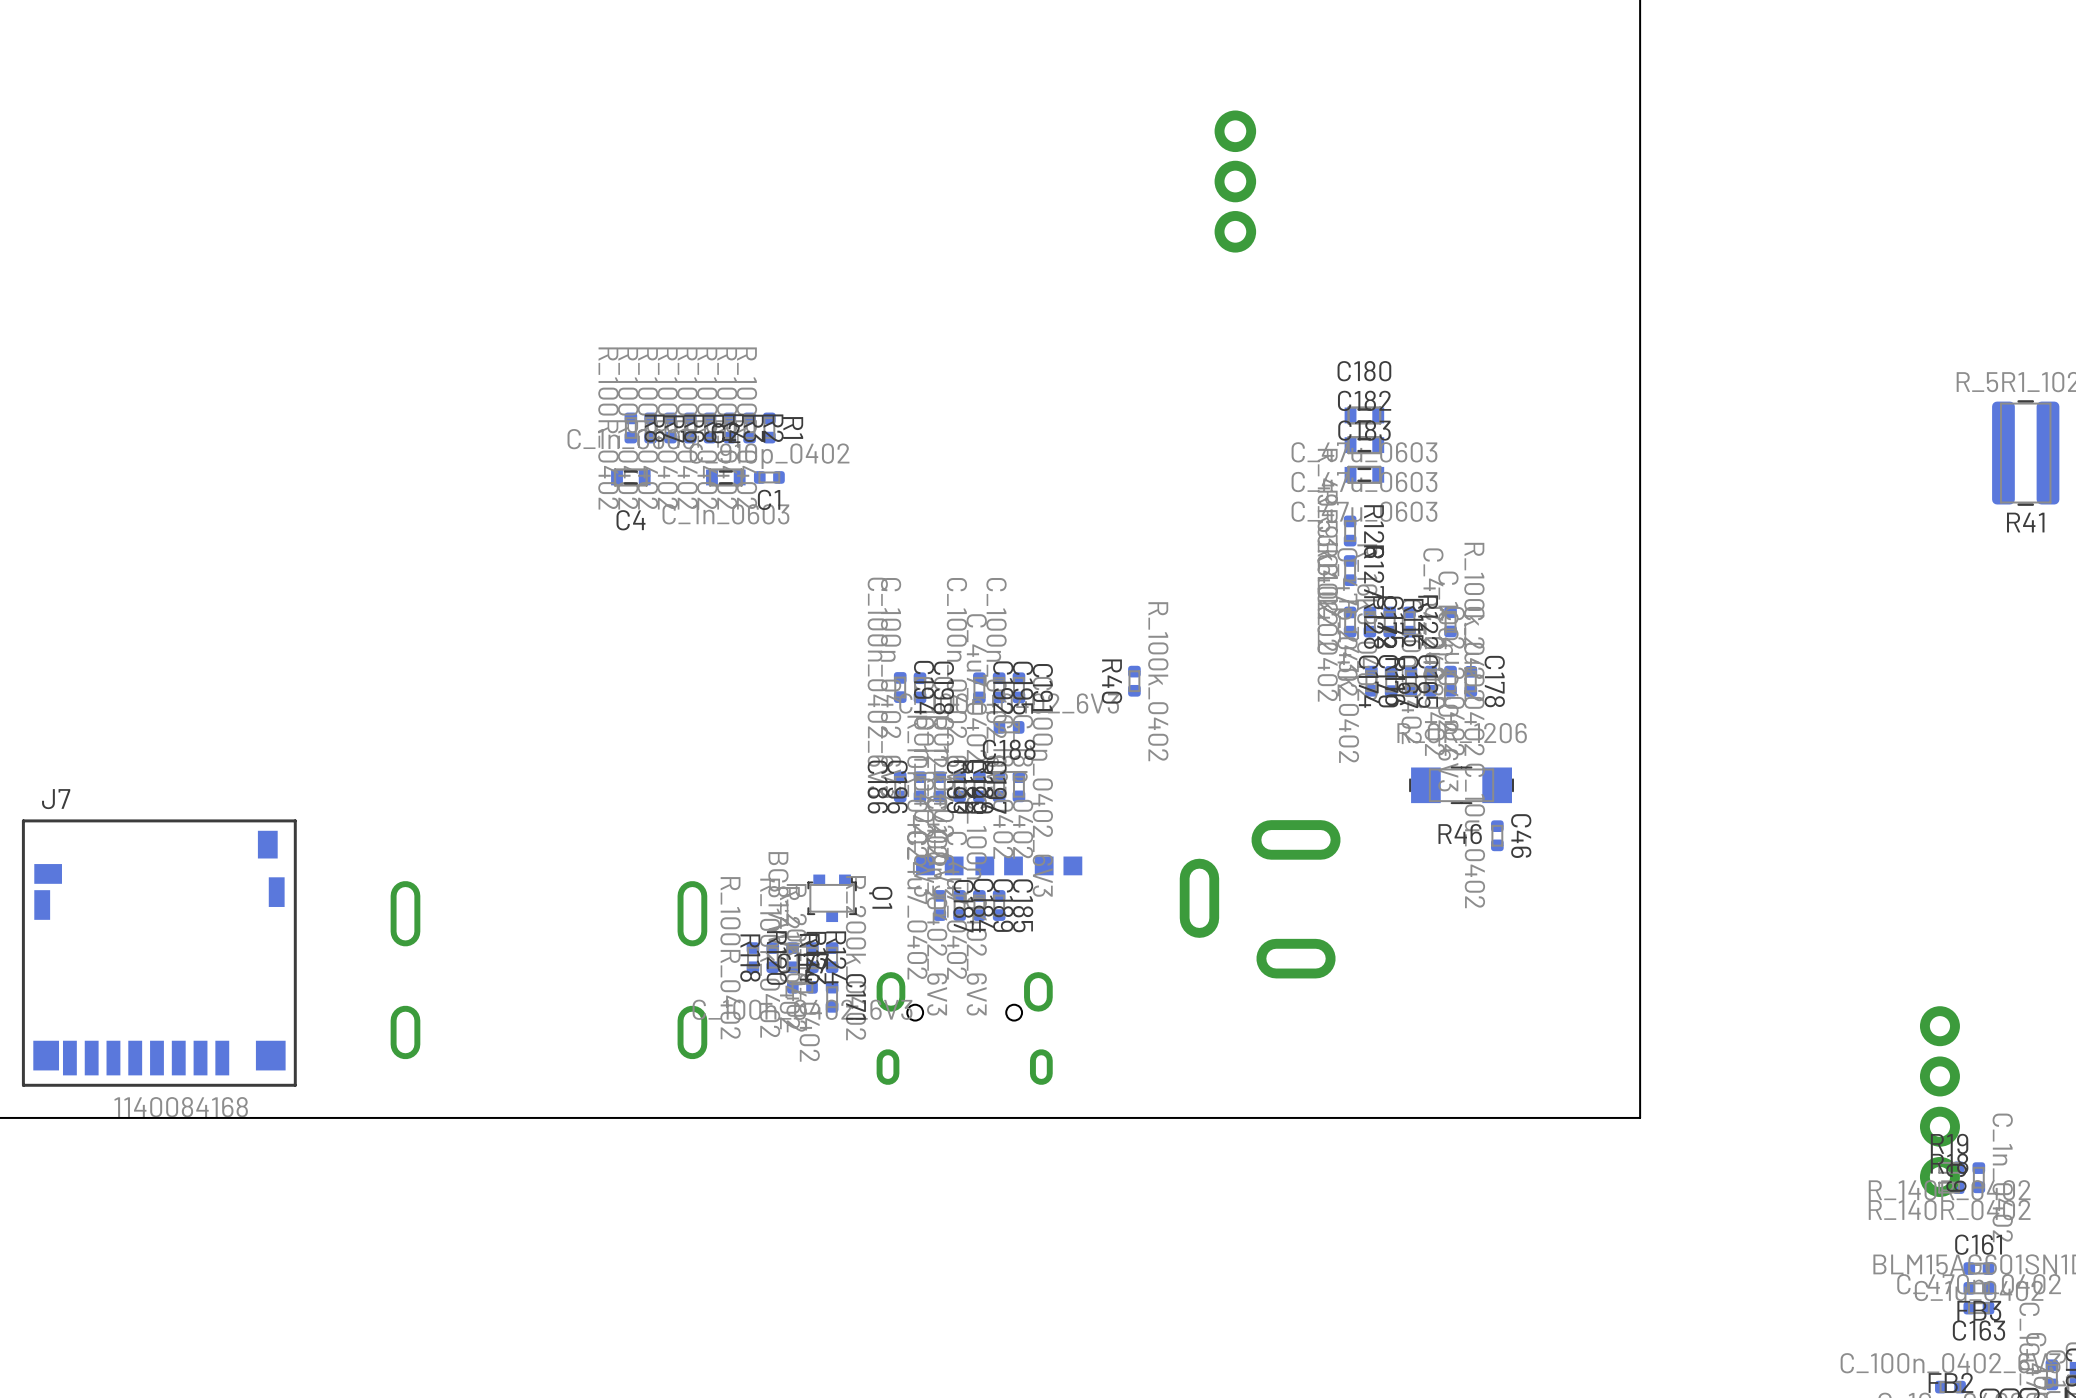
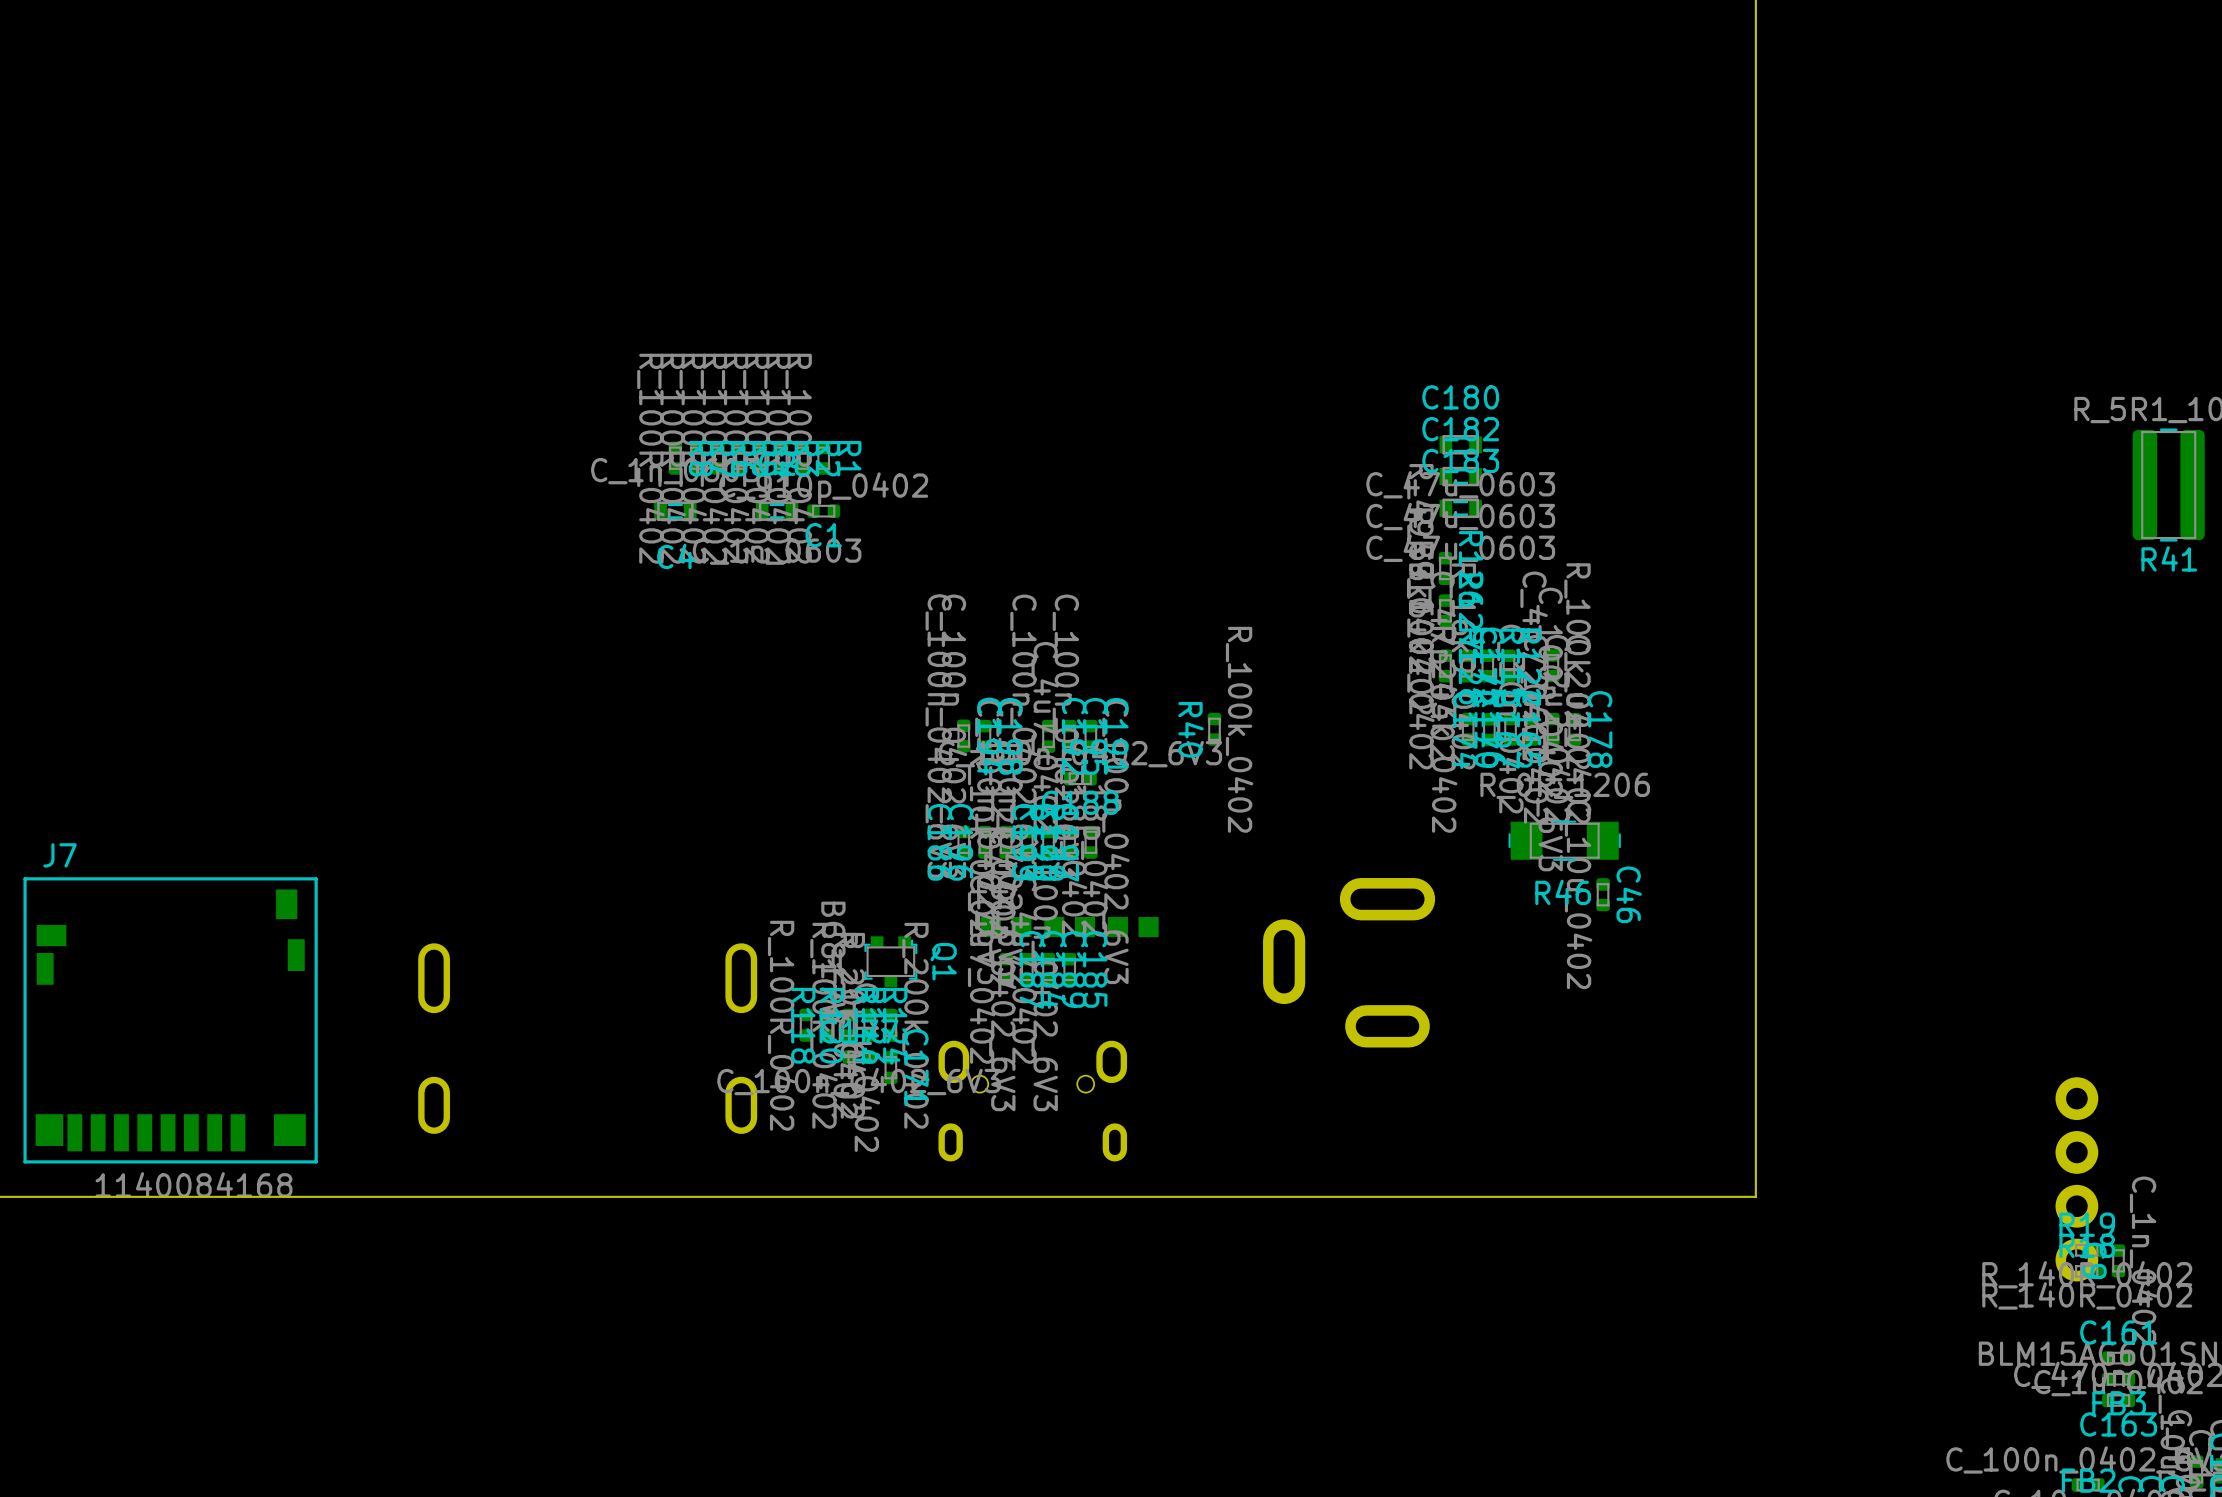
part: (1235, 181) -> none

